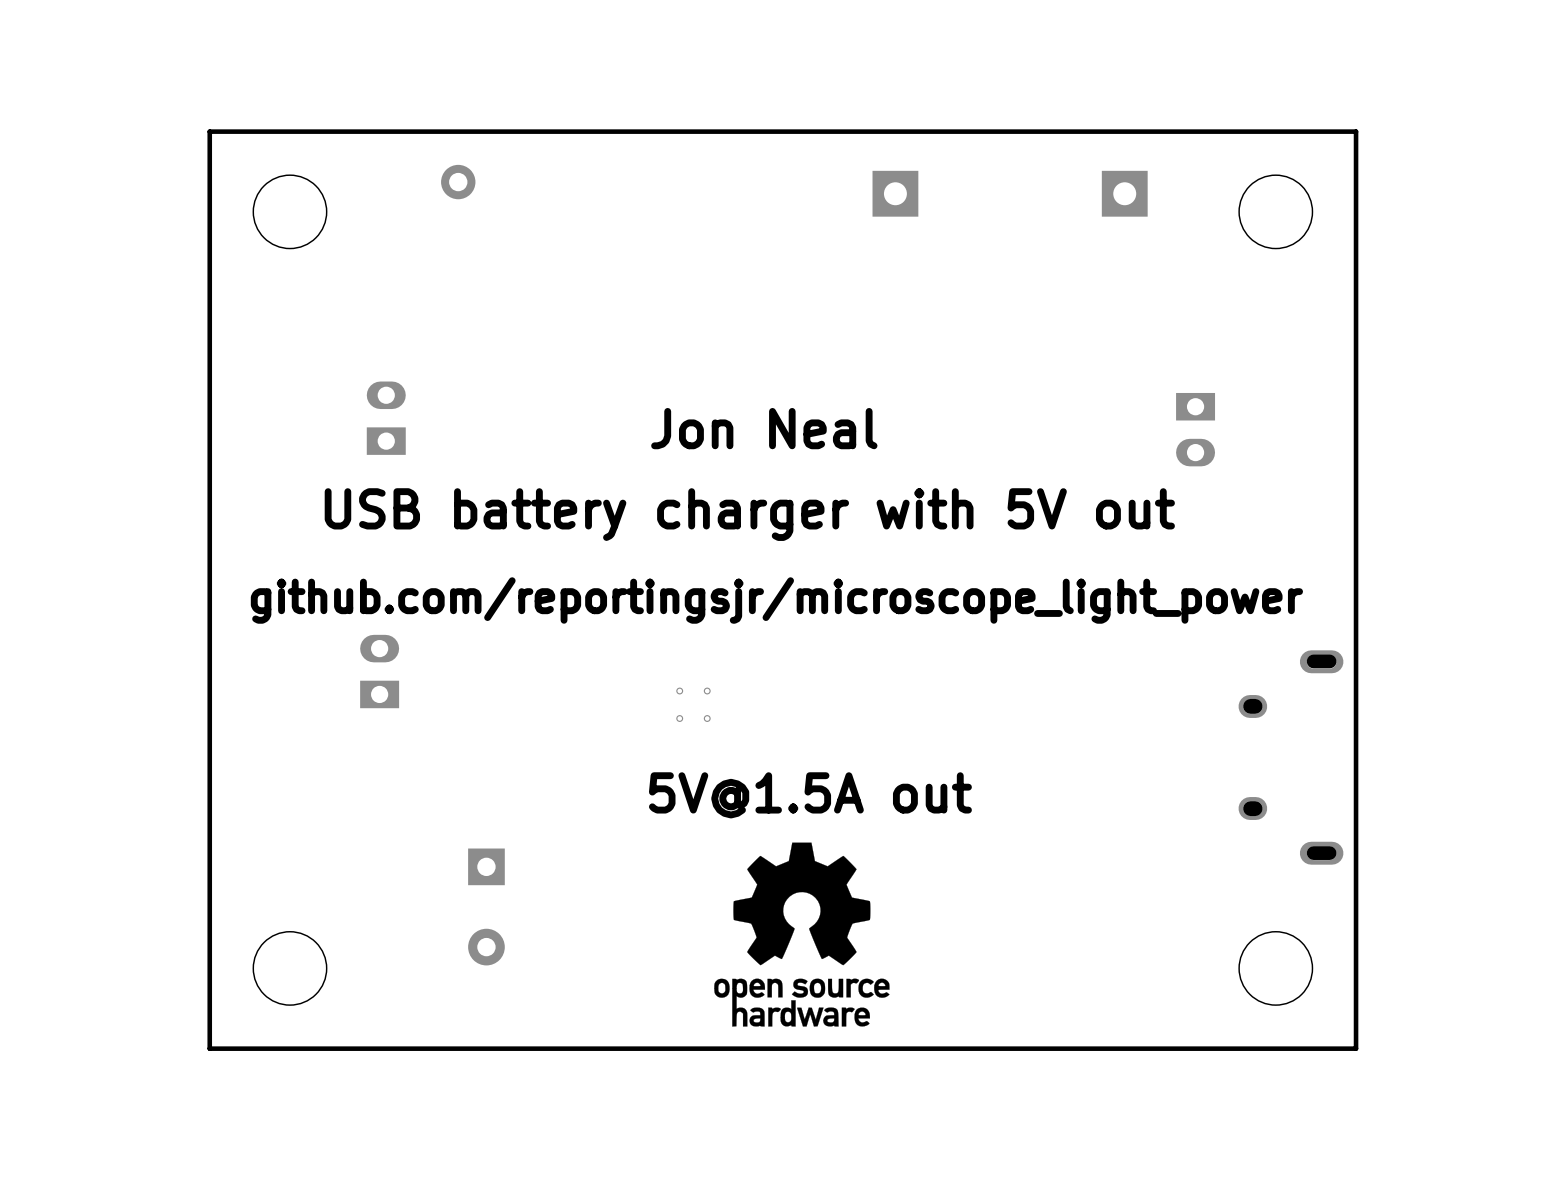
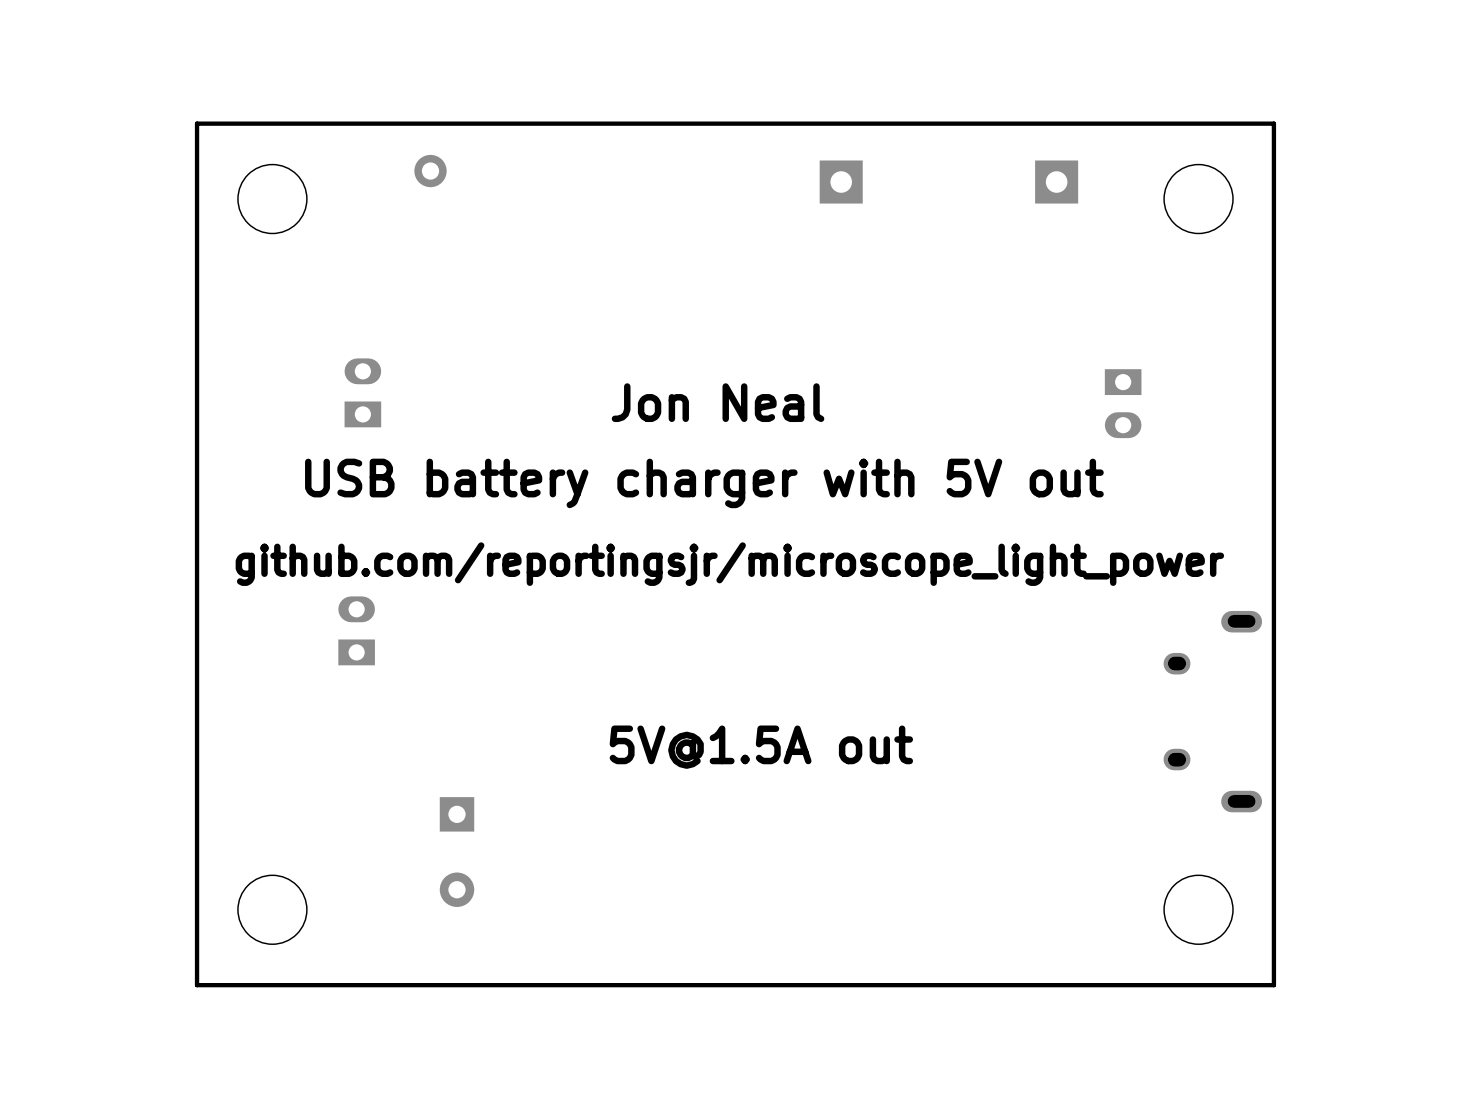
part: (693, 704) -> none
drawing: [714, 842, 890, 1027] -> none

